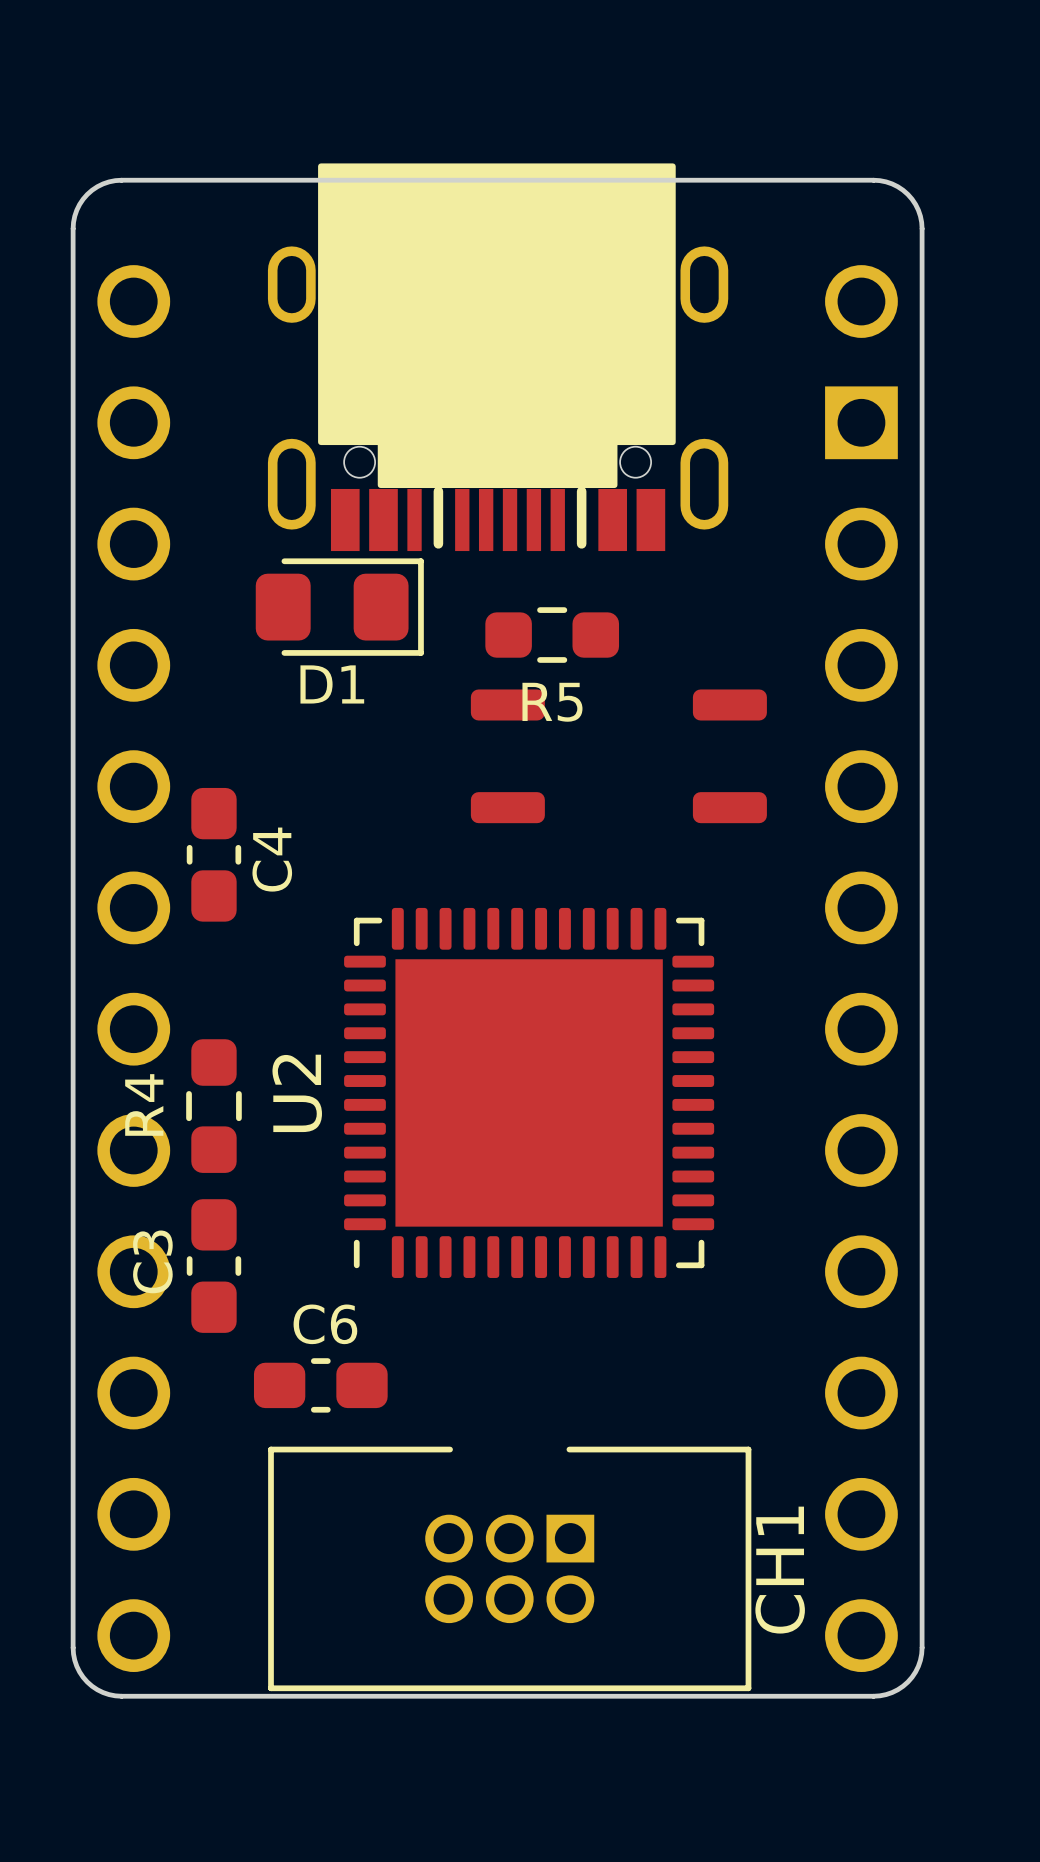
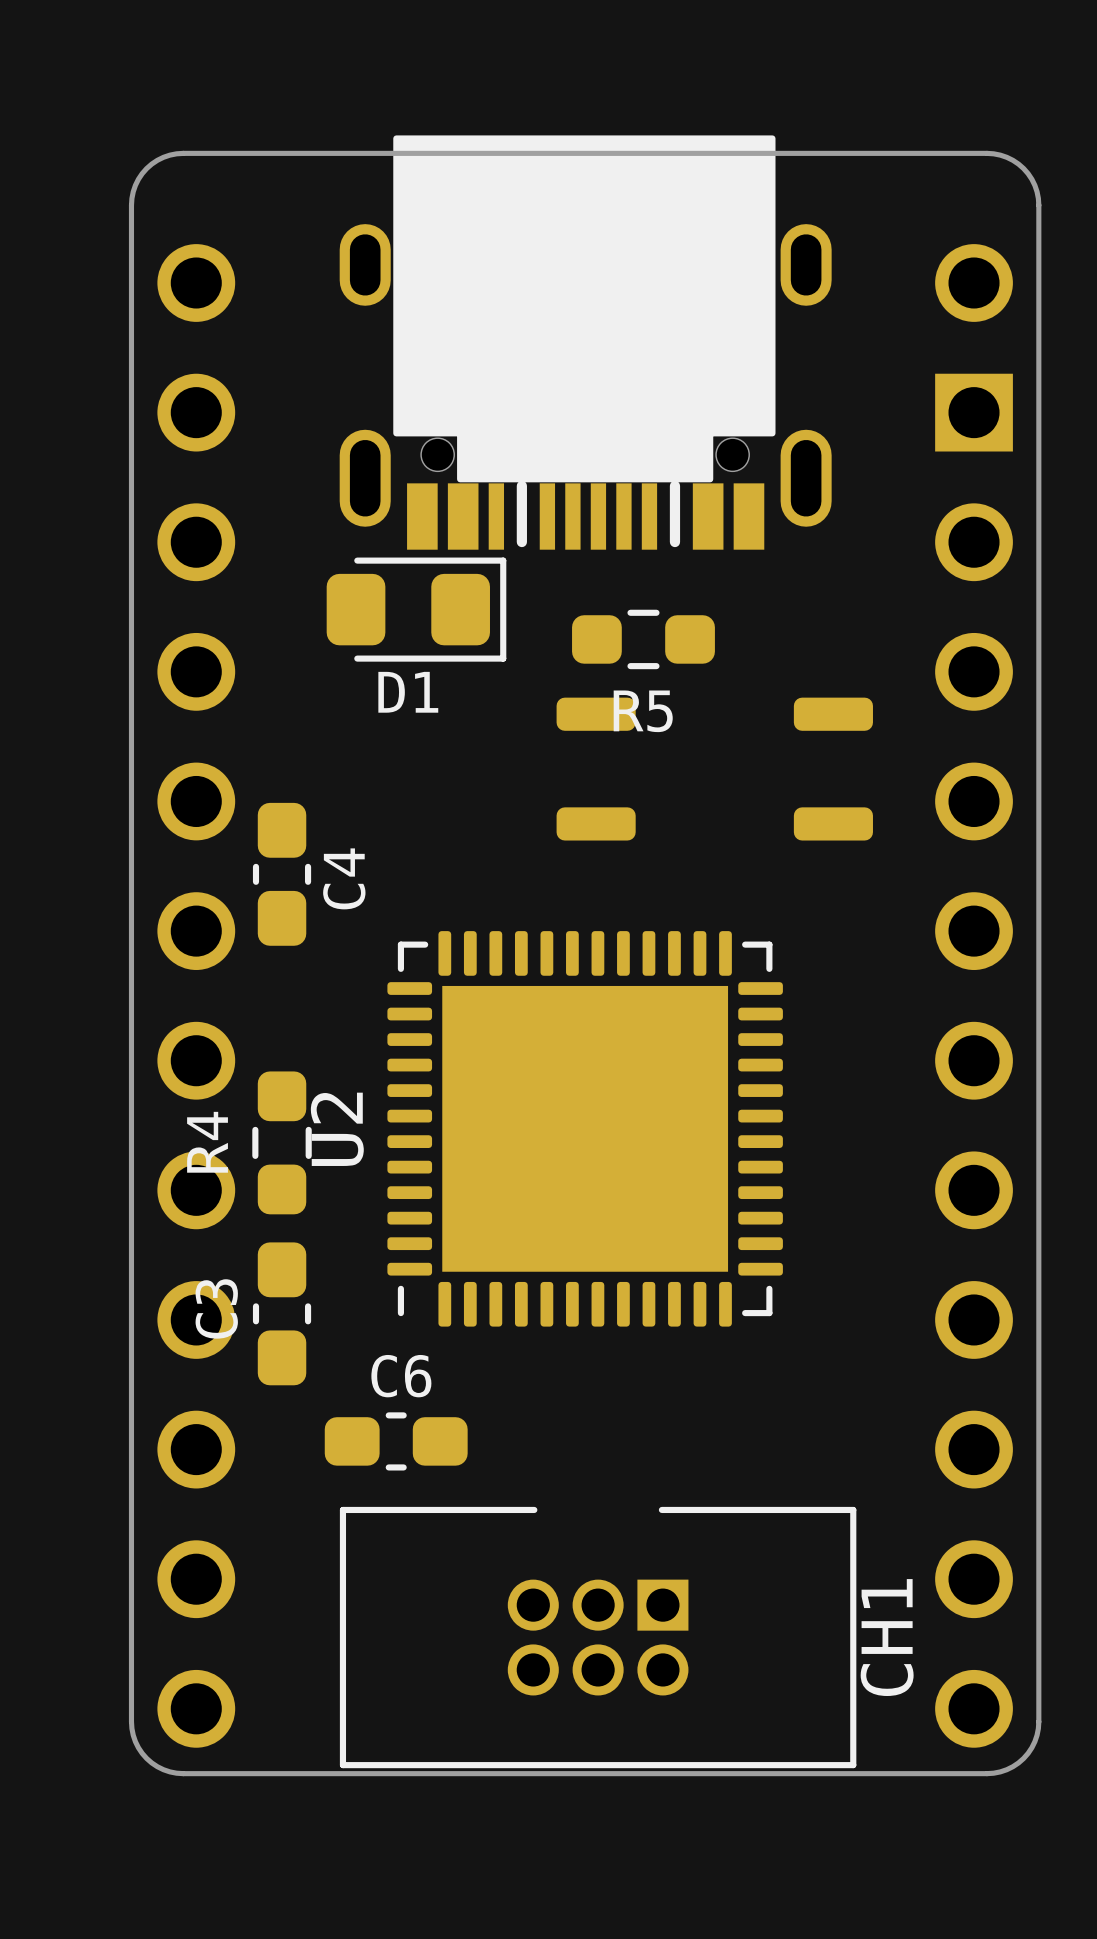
U2 position: (529, 1092) -> (585, 1128)

